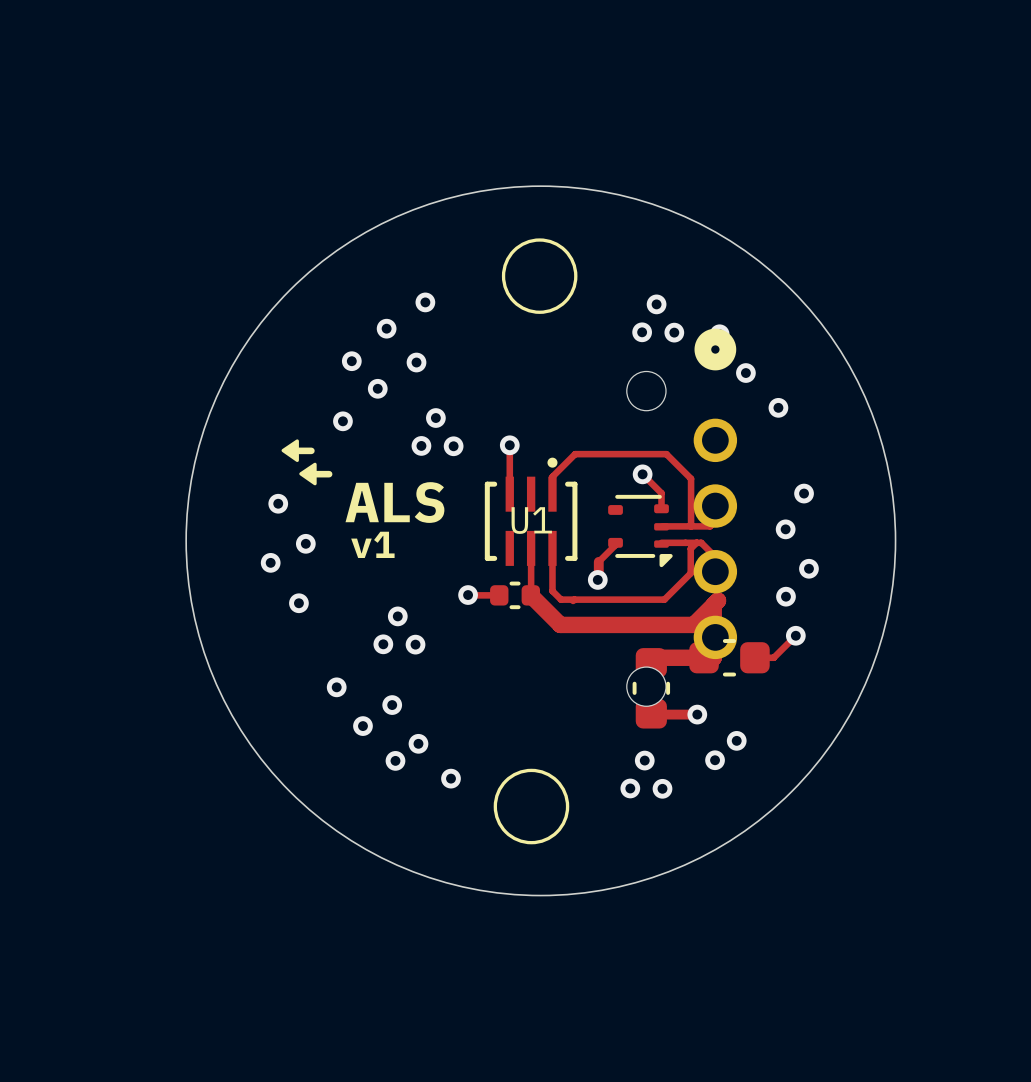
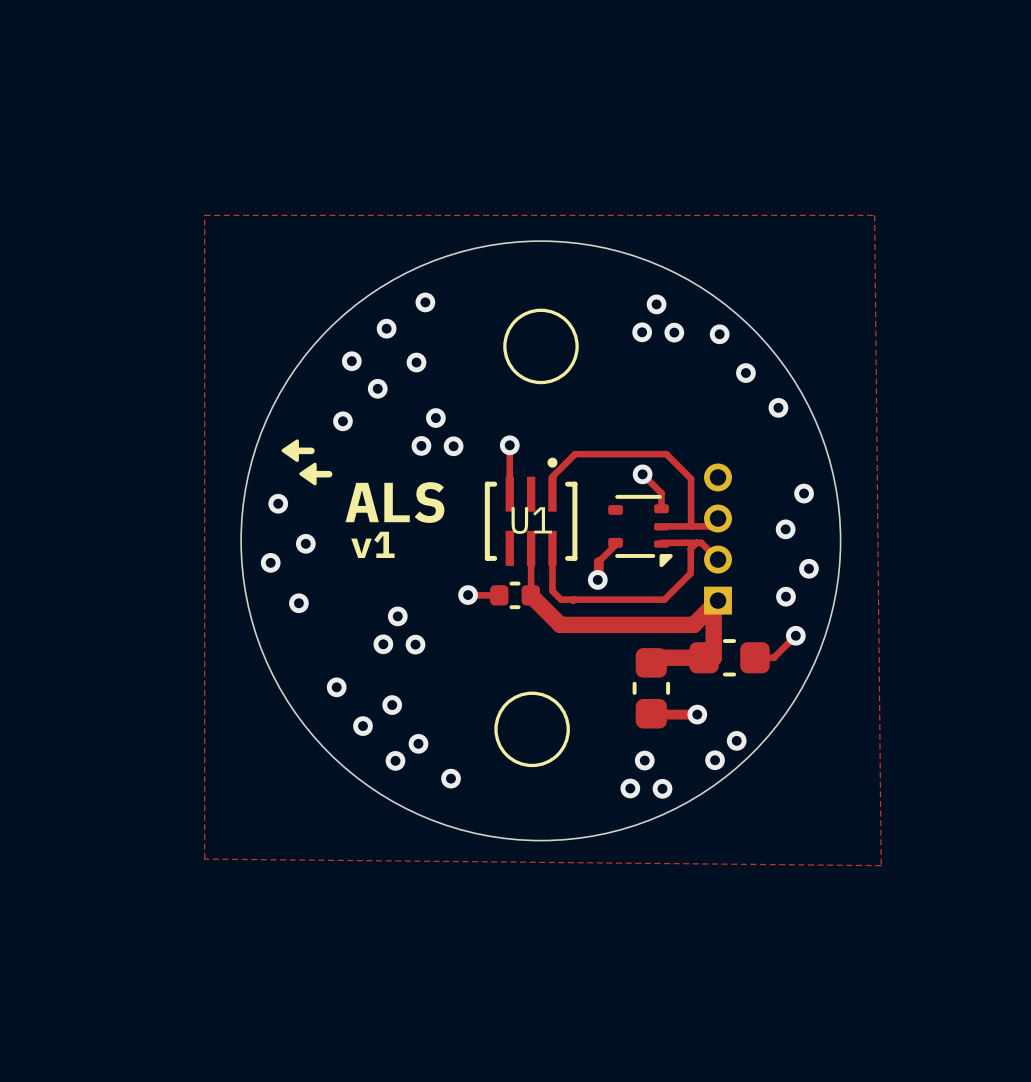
round board edge size: [185, 185, 897, 897] -> [240, 240, 842, 842]
zone outline: none -> (204, 215) (874, 215) (881, 865) (204, 859) (204, 215)
drawing position: (539, 276) -> (540, 346)
part: (681, 517) -> none
part: none -> (718, 539)
drawing position: (531, 806) -> (532, 729)

